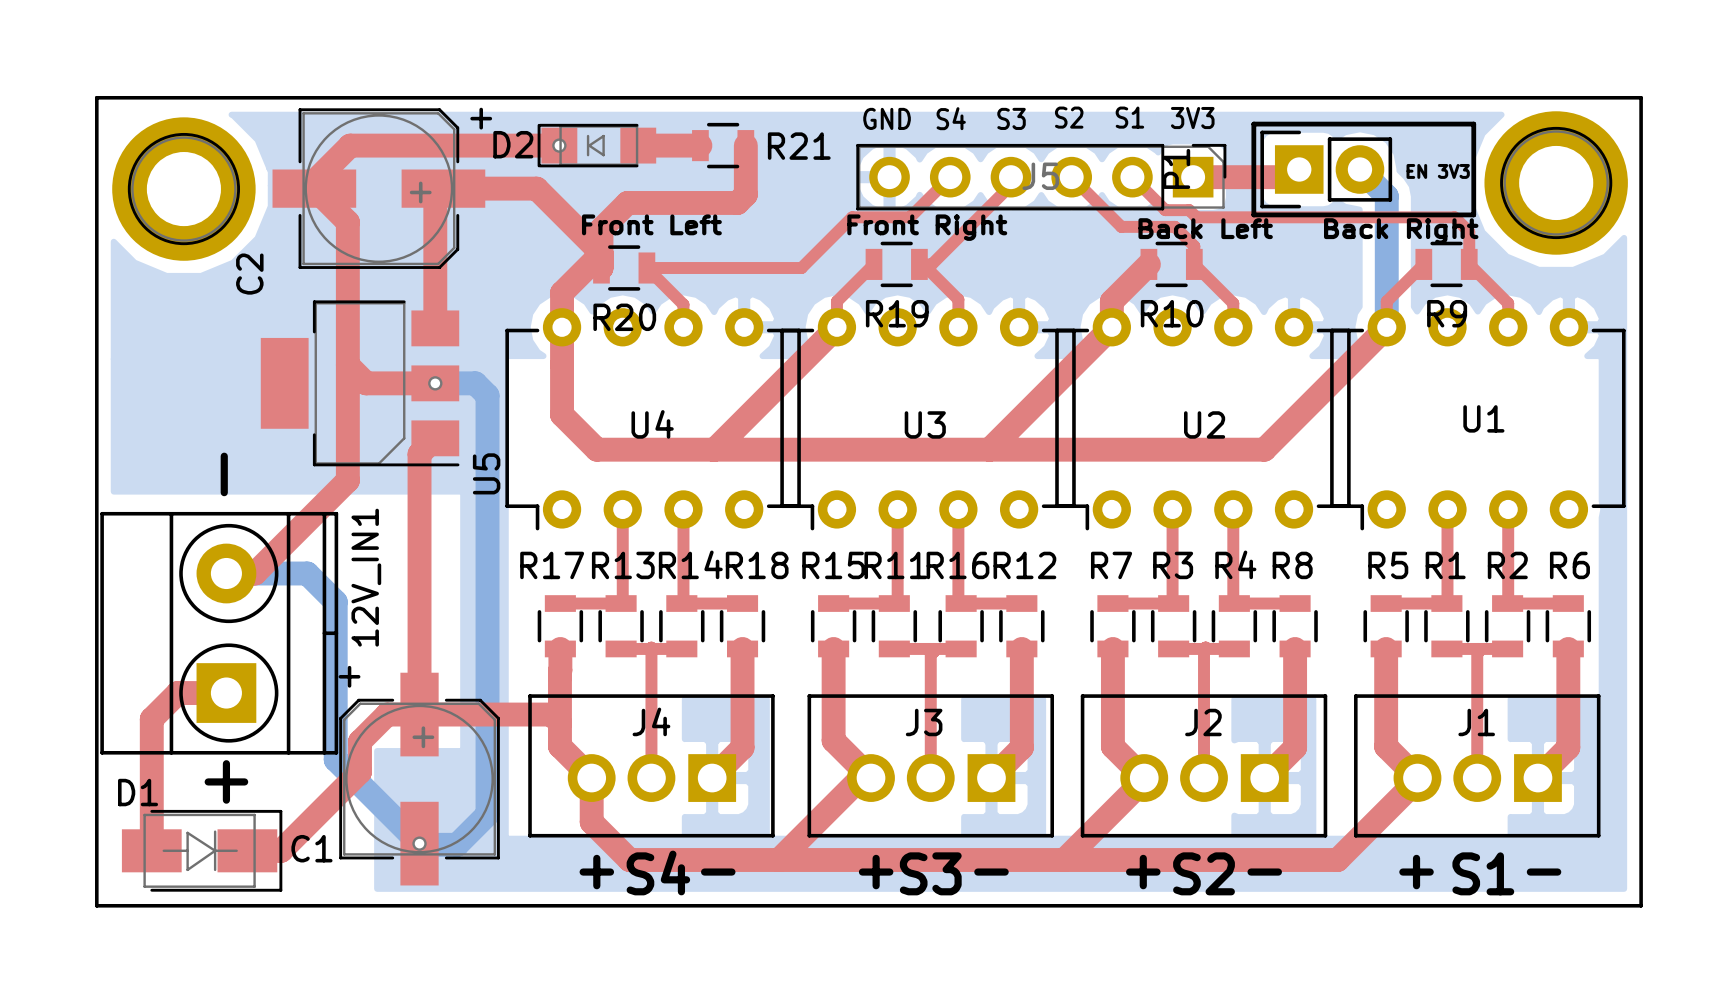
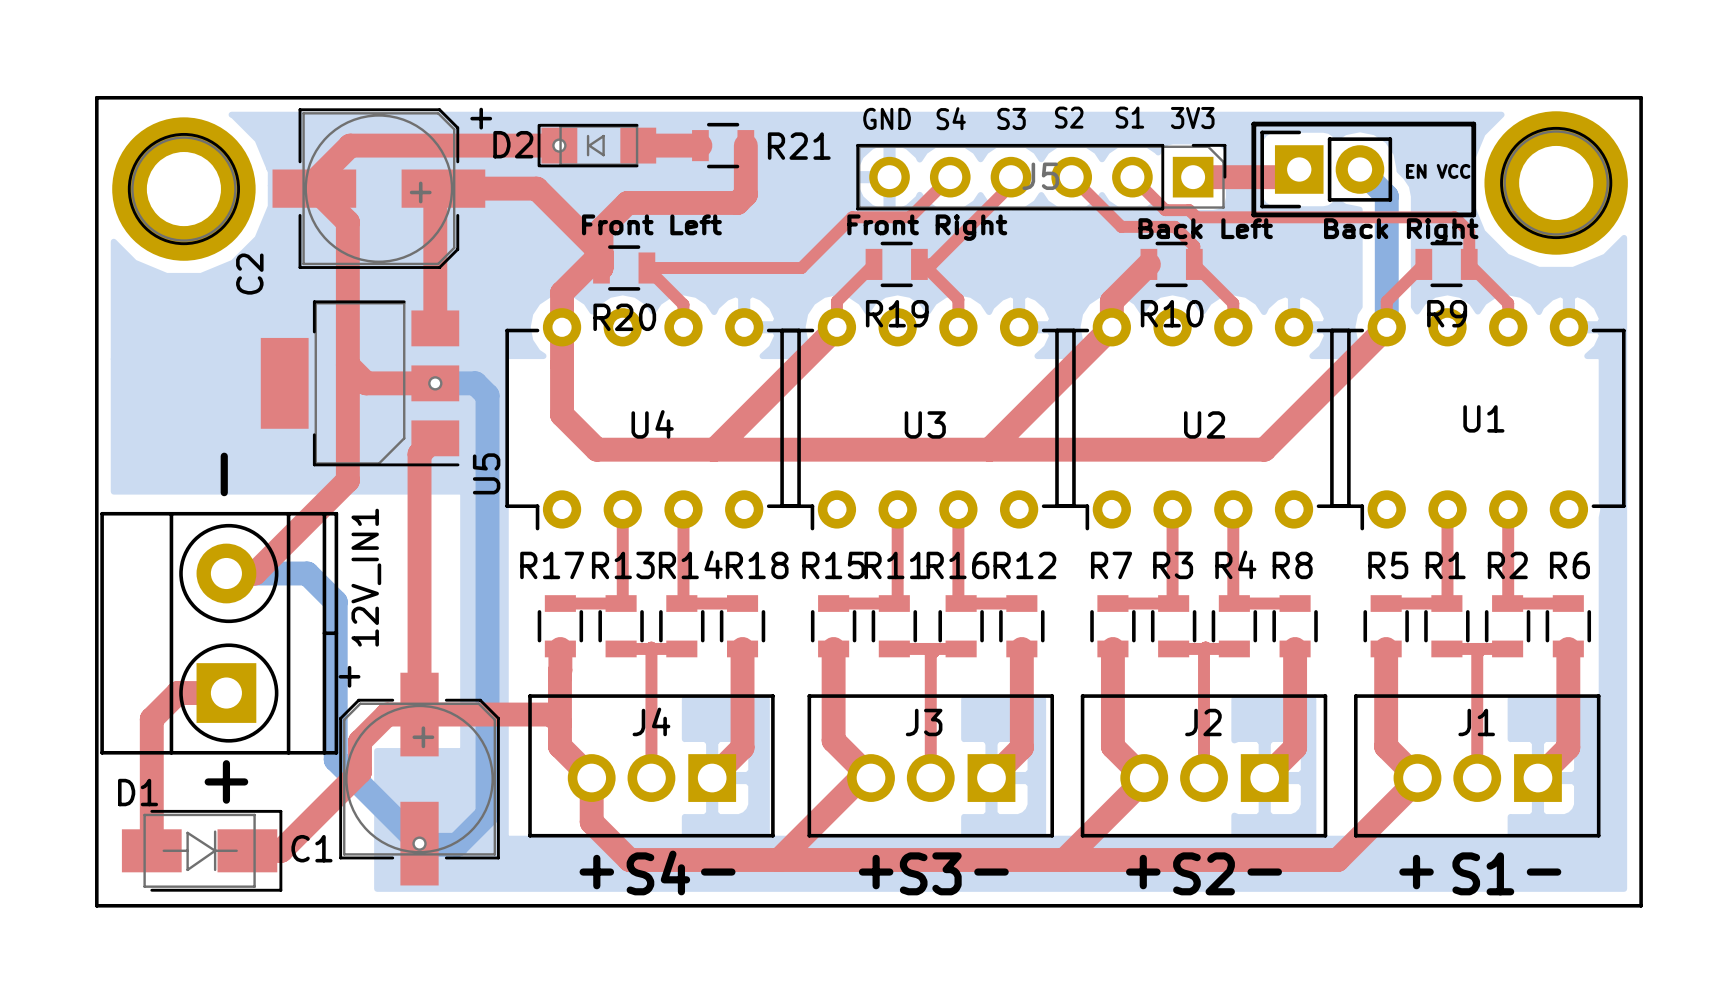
P1 name: P1 (1176, 168) -> none
text: EN 3V3 (1438, 171) -> EN VCC (1438, 171)

